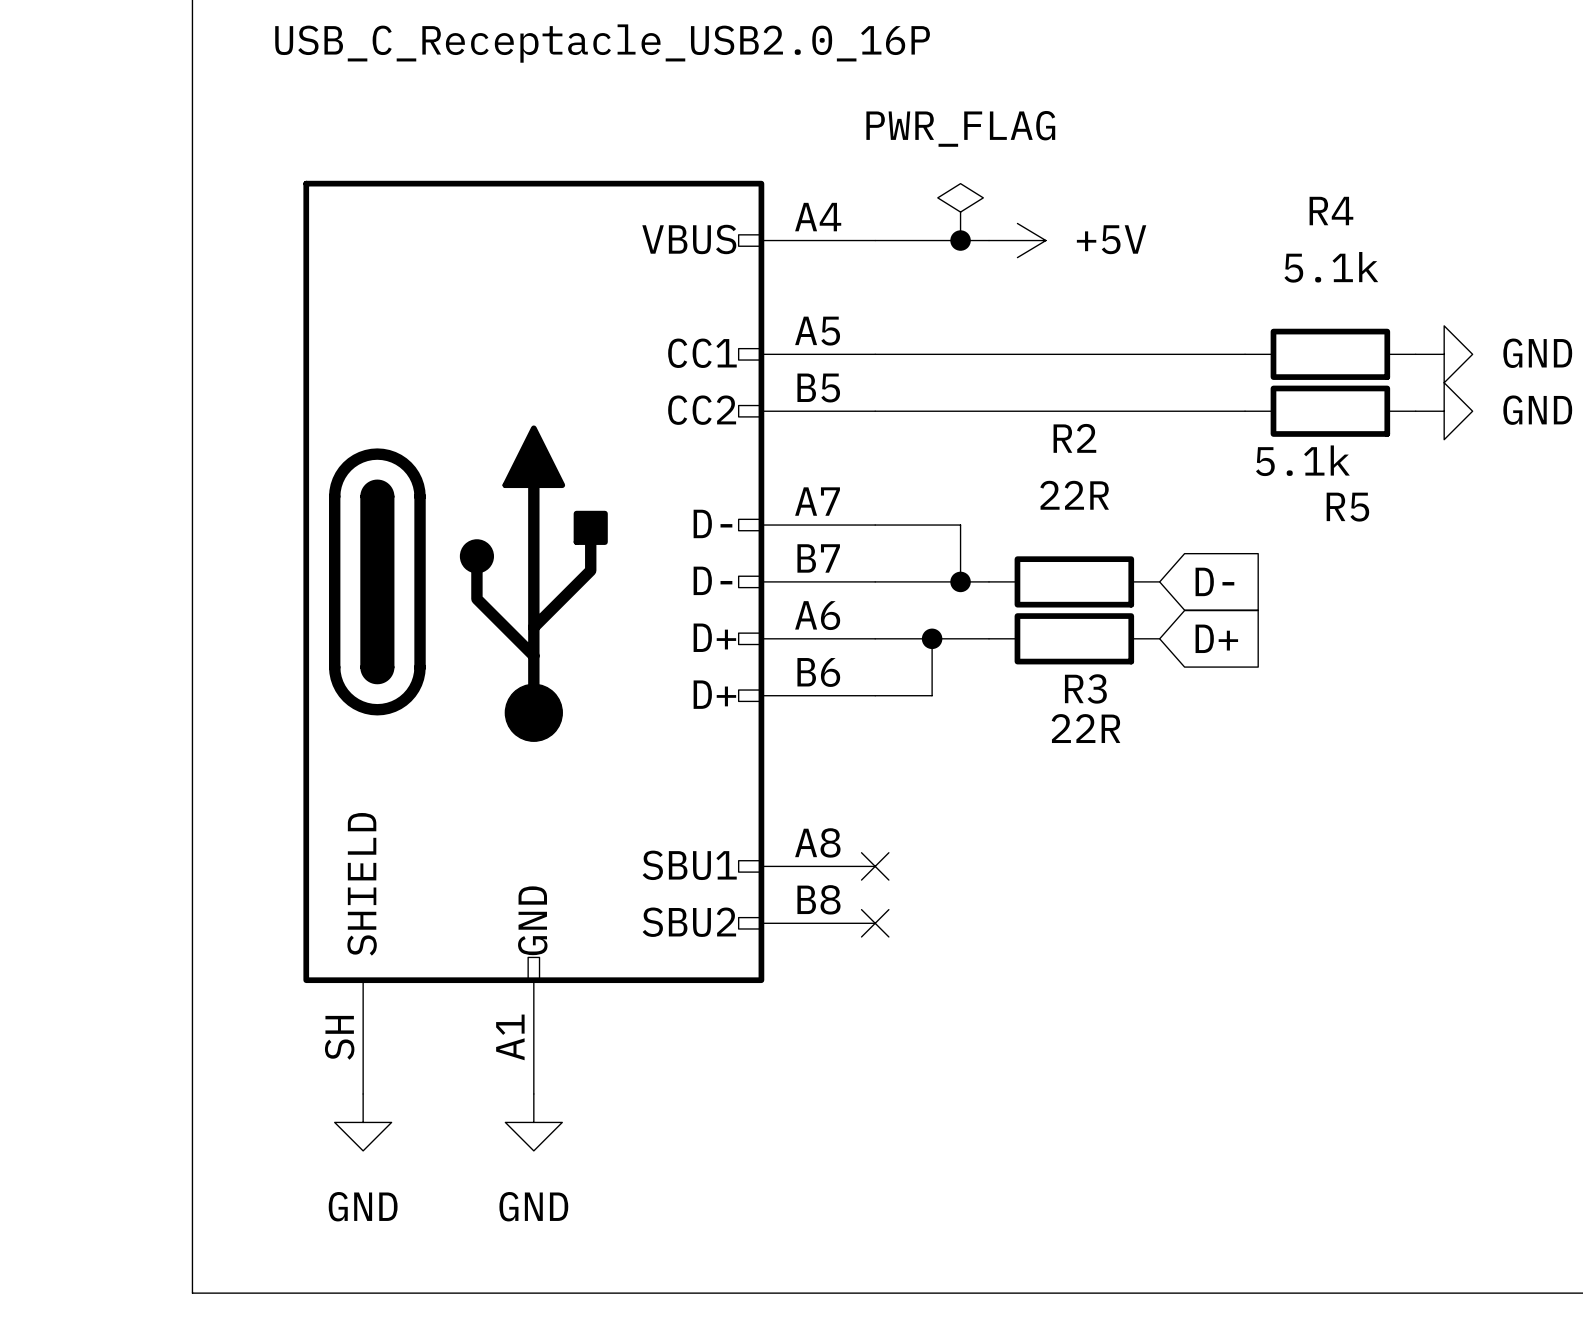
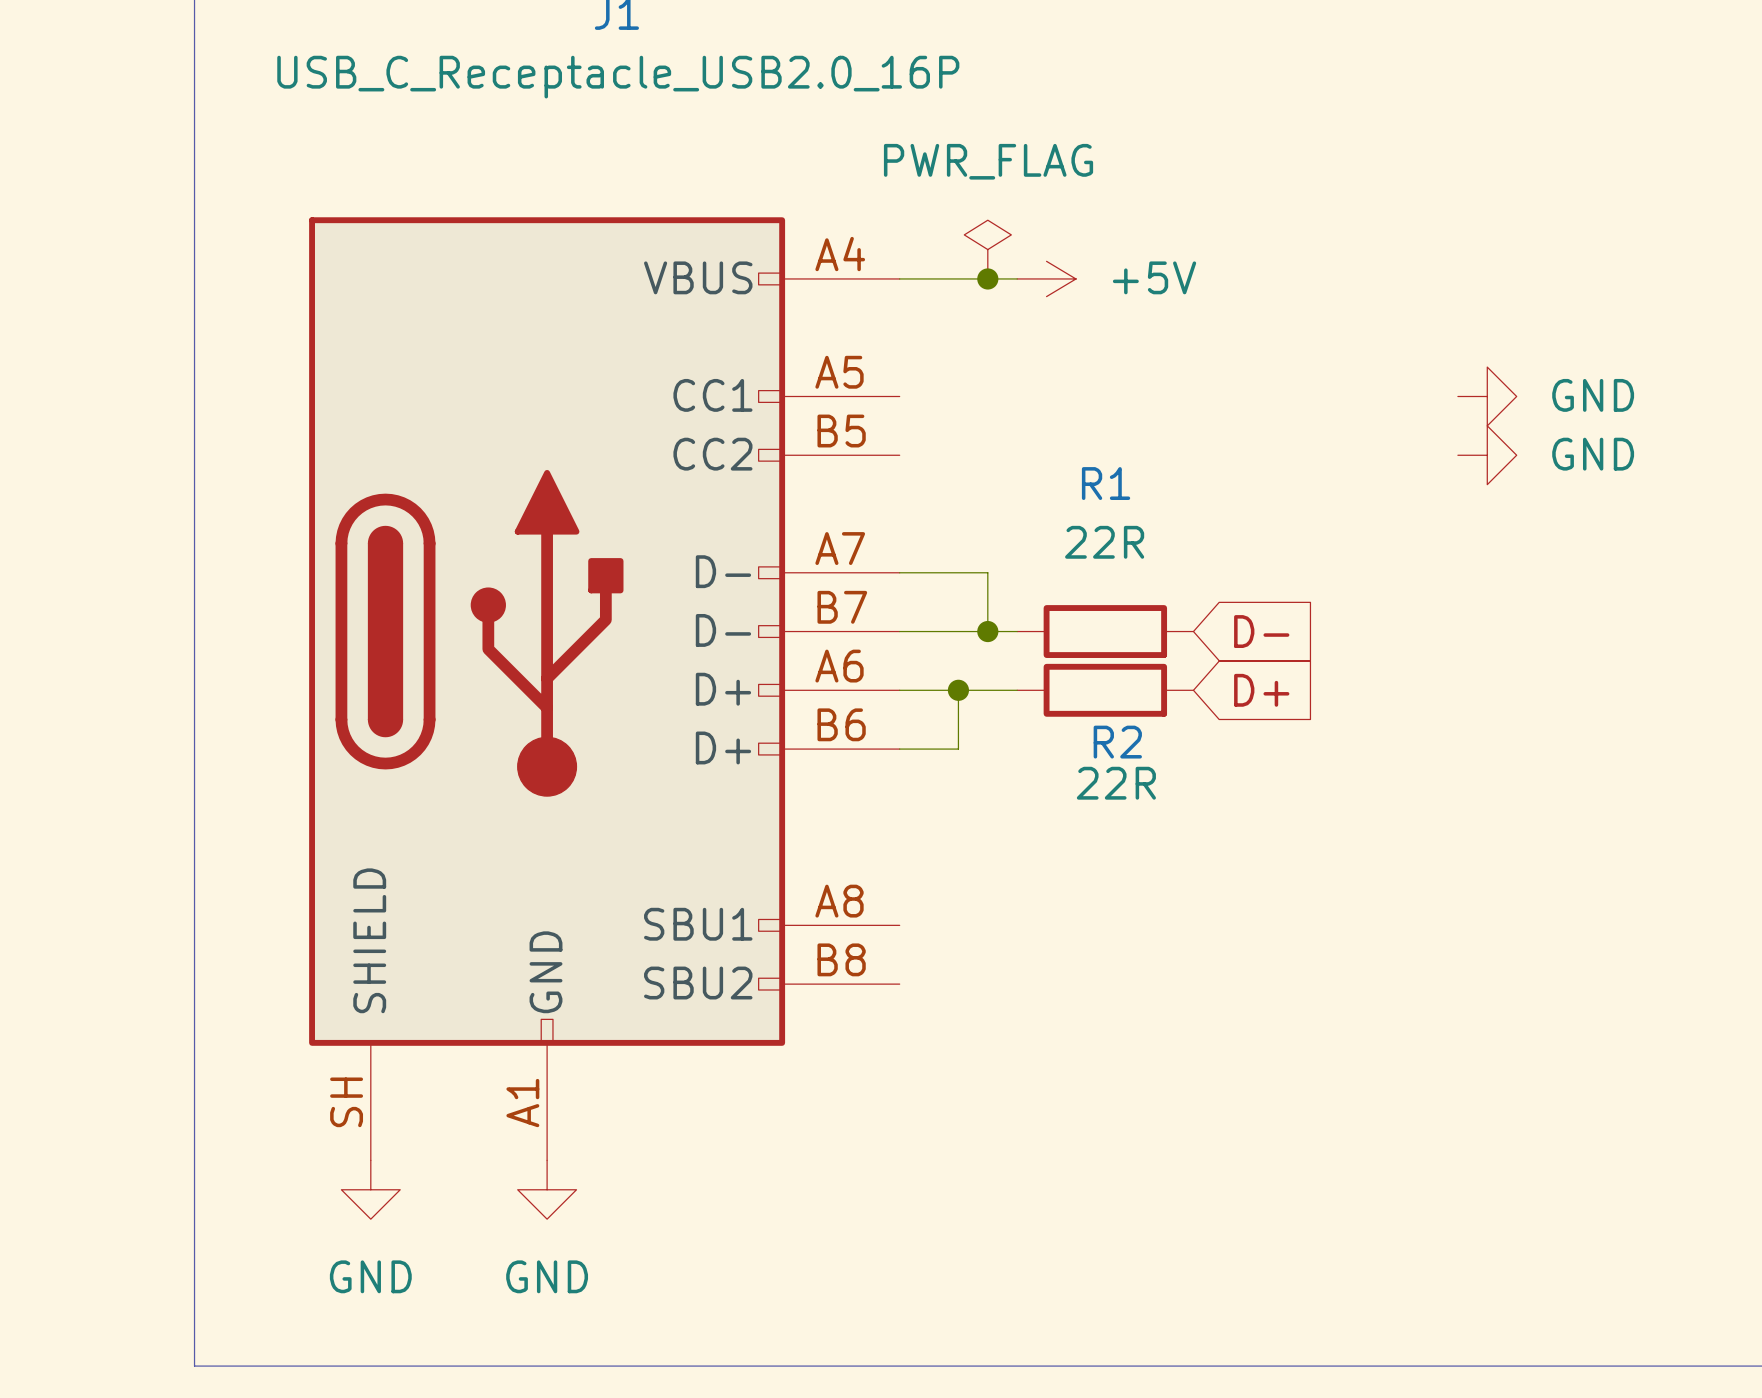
wire: (875, 354) (1245, 354) -> none
R4: 5.1k (1330, 354) -> none
wire: (875, 411) (1245, 411) -> none
R5: 5.1k (1330, 411) -> none
R2 name: R2 (1074, 438) -> R1 (1106, 483)
R3 name: R3 (1085, 688) -> R2 (1117, 742)
no-connect mark: (875, 866) -> none
no-connect mark: (875, 923) -> none

